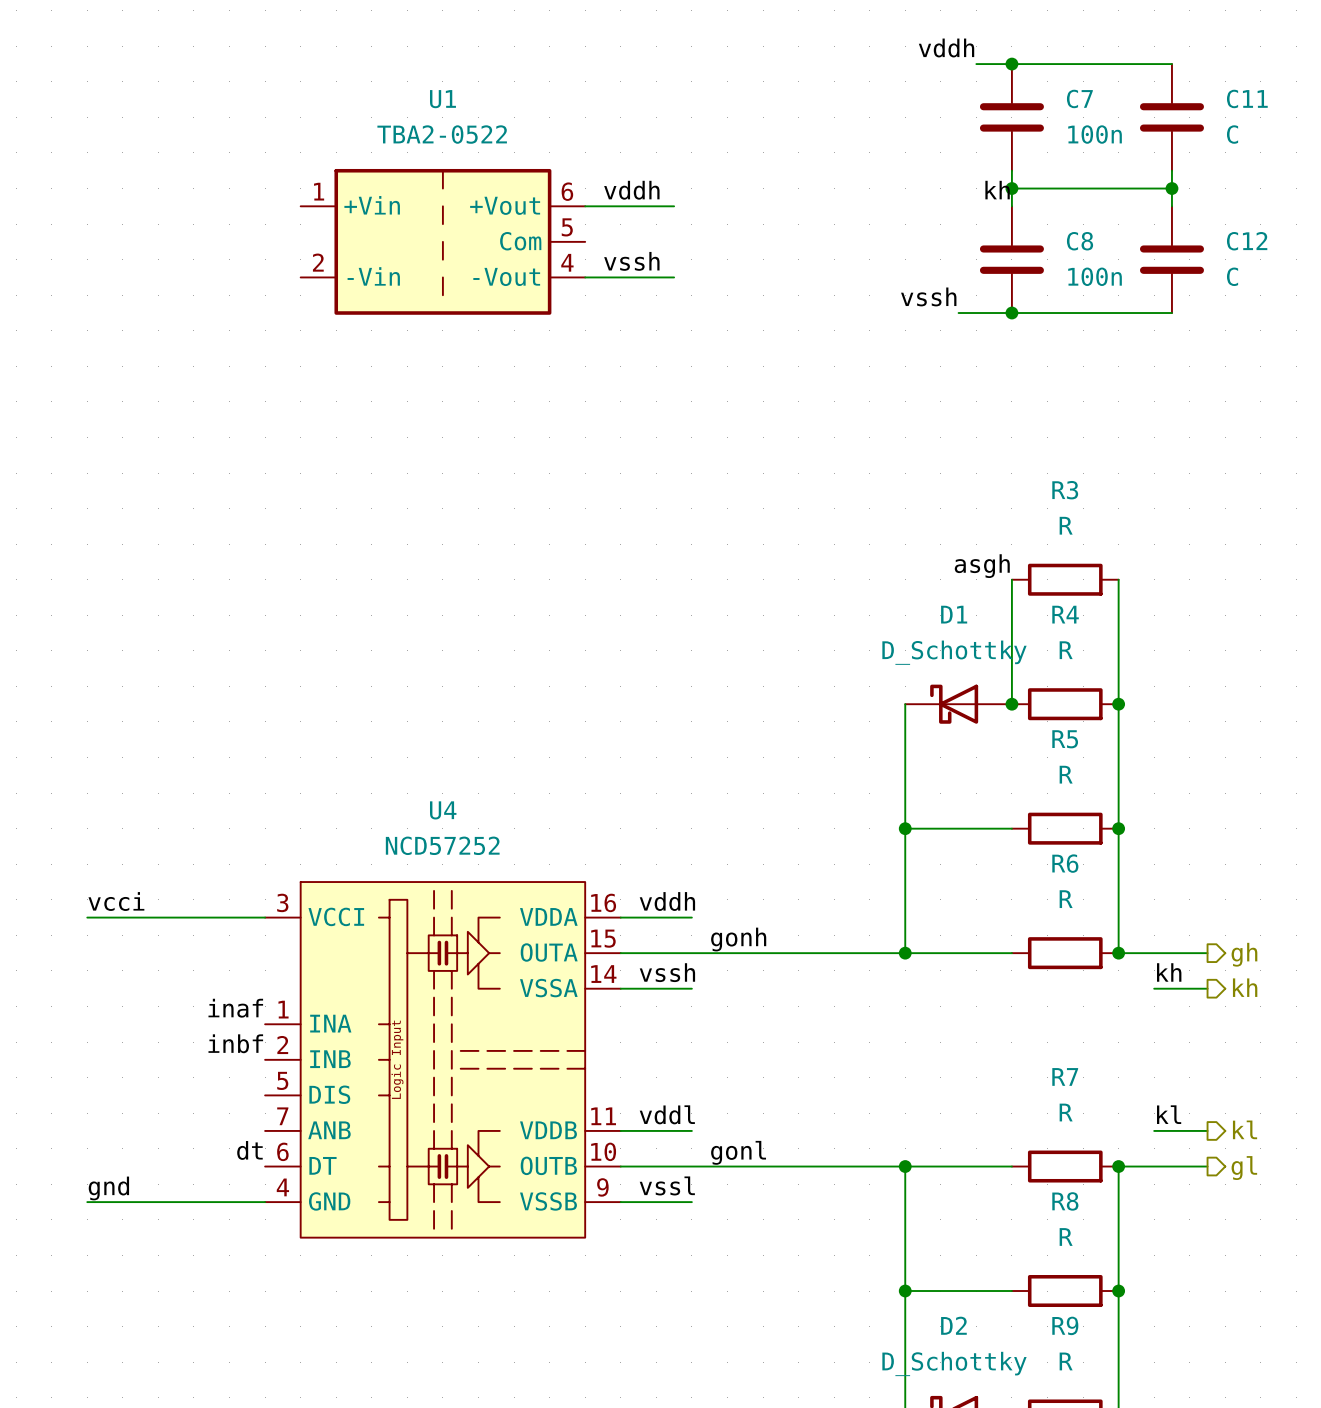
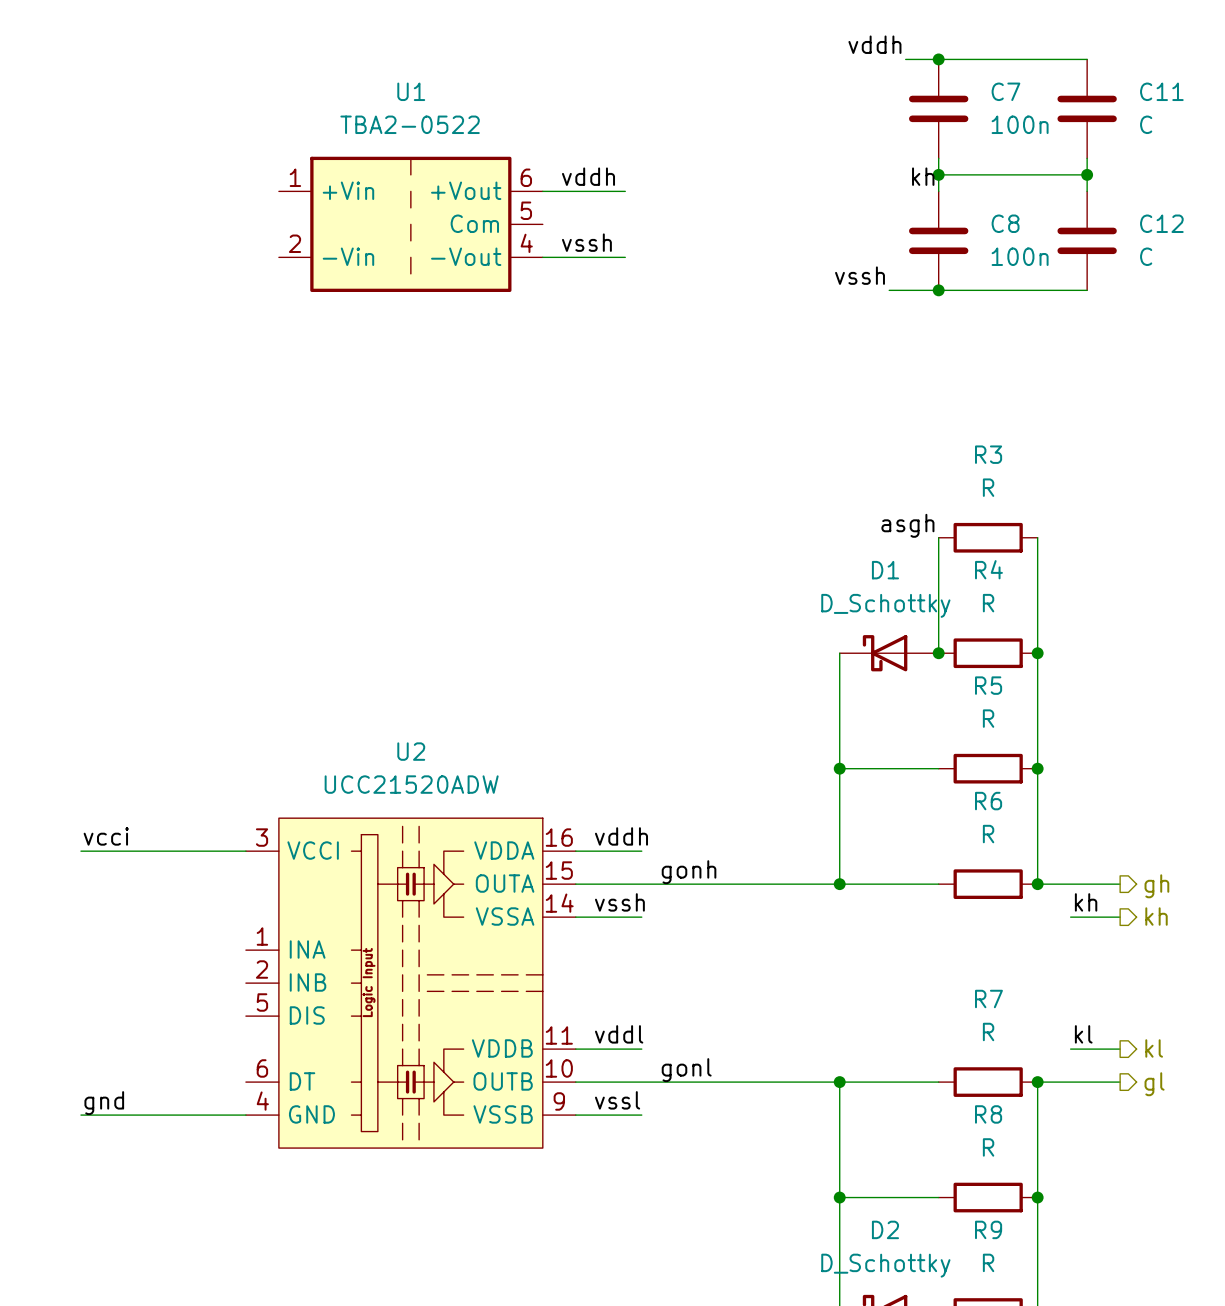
label: inaf (235, 1008) -> none
label: inbf (235, 1043) -> none
U4: NCD57252 (442, 1059) -> none
U2: none -> UCC21520ADW (410, 983)
label: dt (249, 1150) -> none

